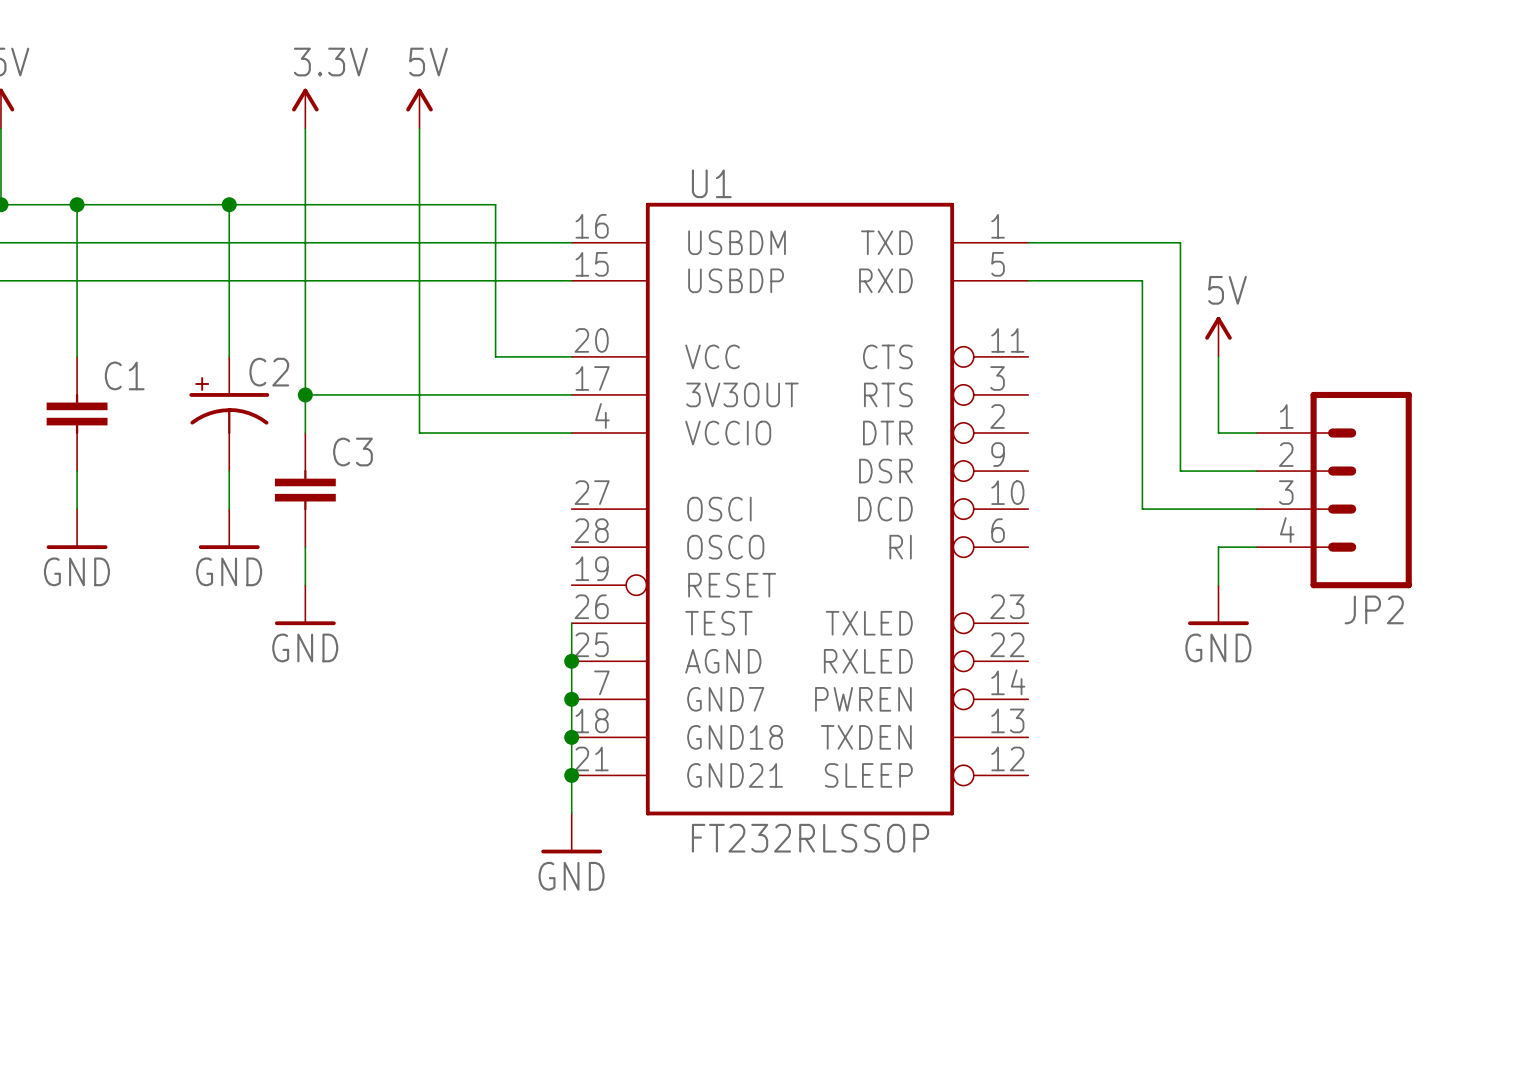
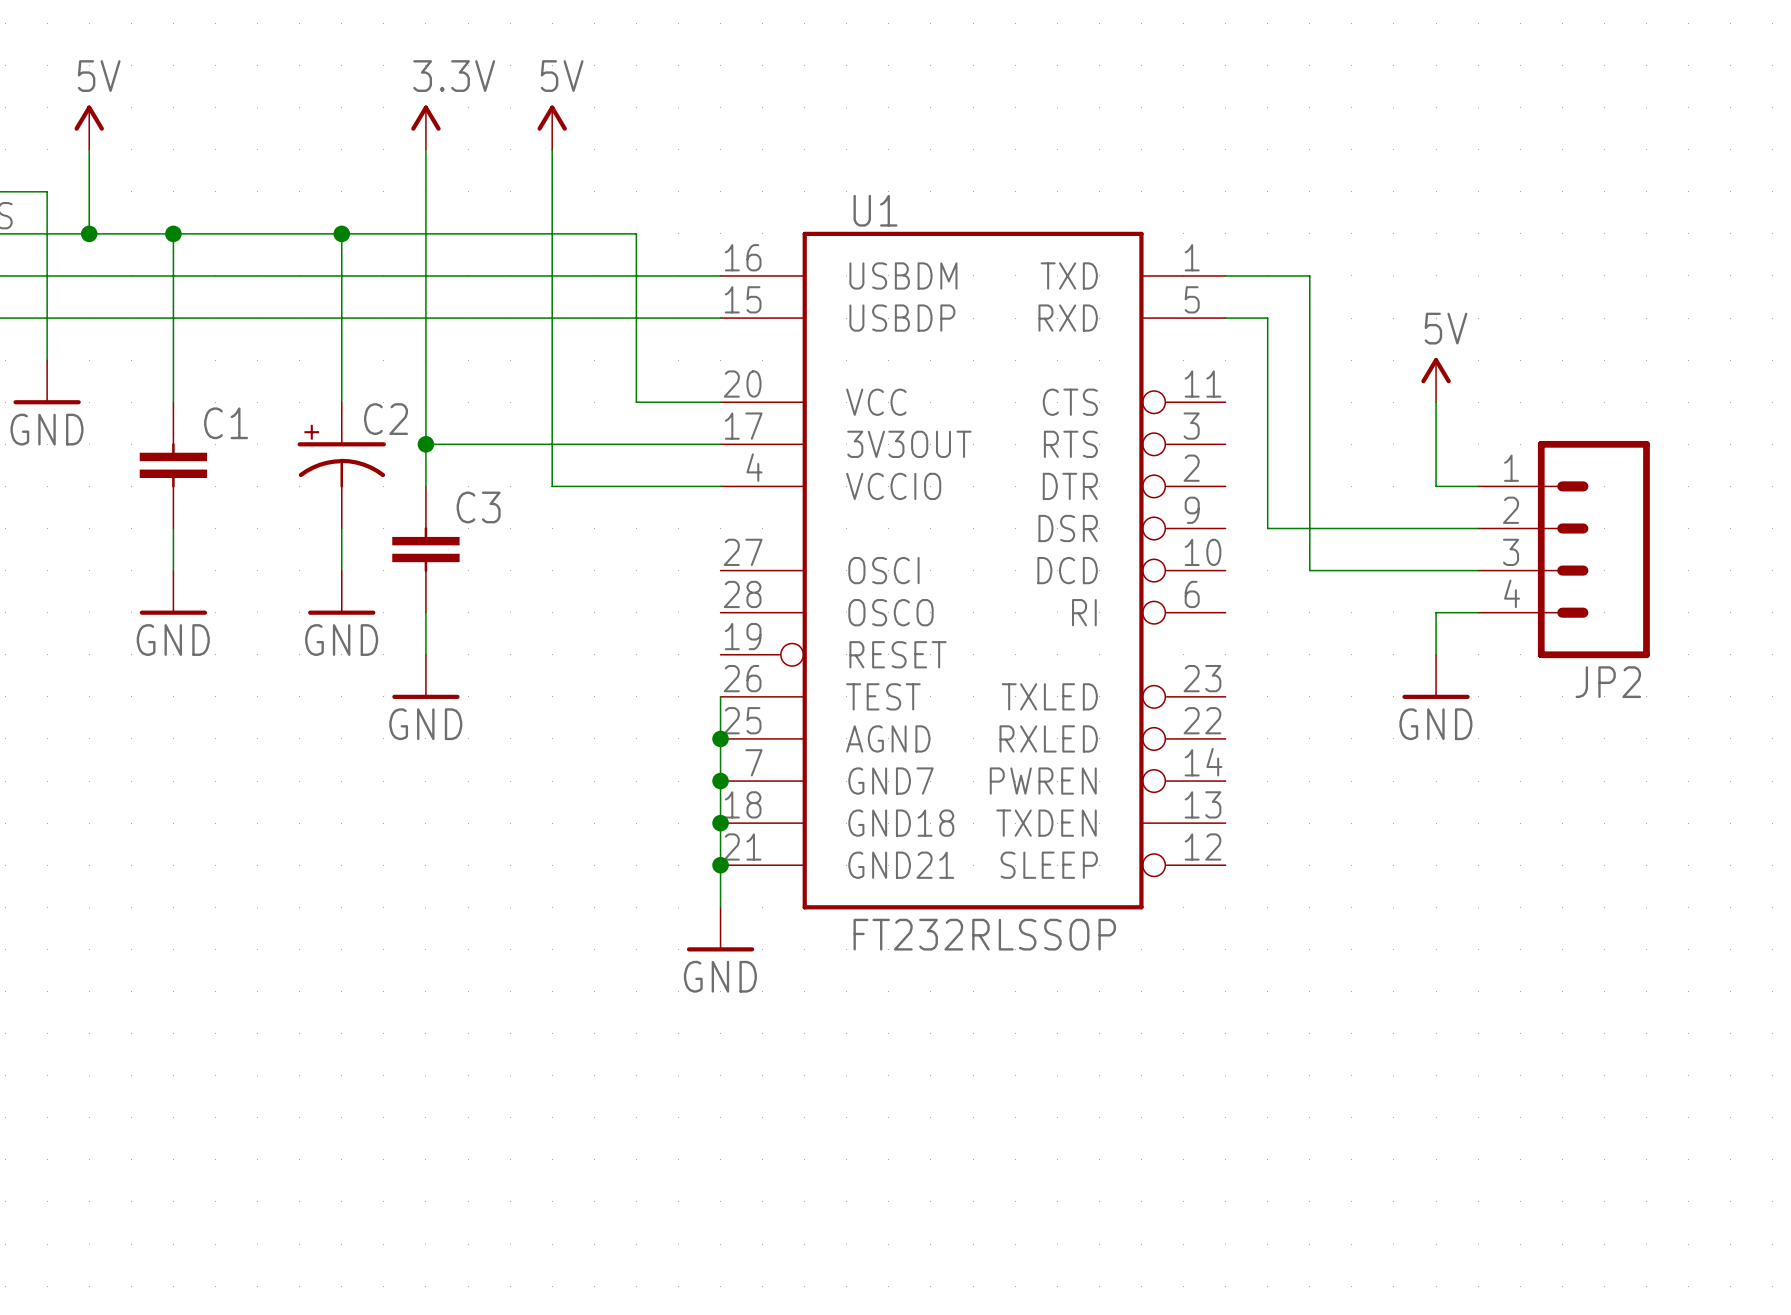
wire: (1104, 242) (1180, 242) (1180, 471) -> (1267, 318) (1267, 528) (1393, 528)
wire: (1066, 280) (1142, 280) (1142, 509) -> (1309, 275) (1309, 570) (1351, 570)

